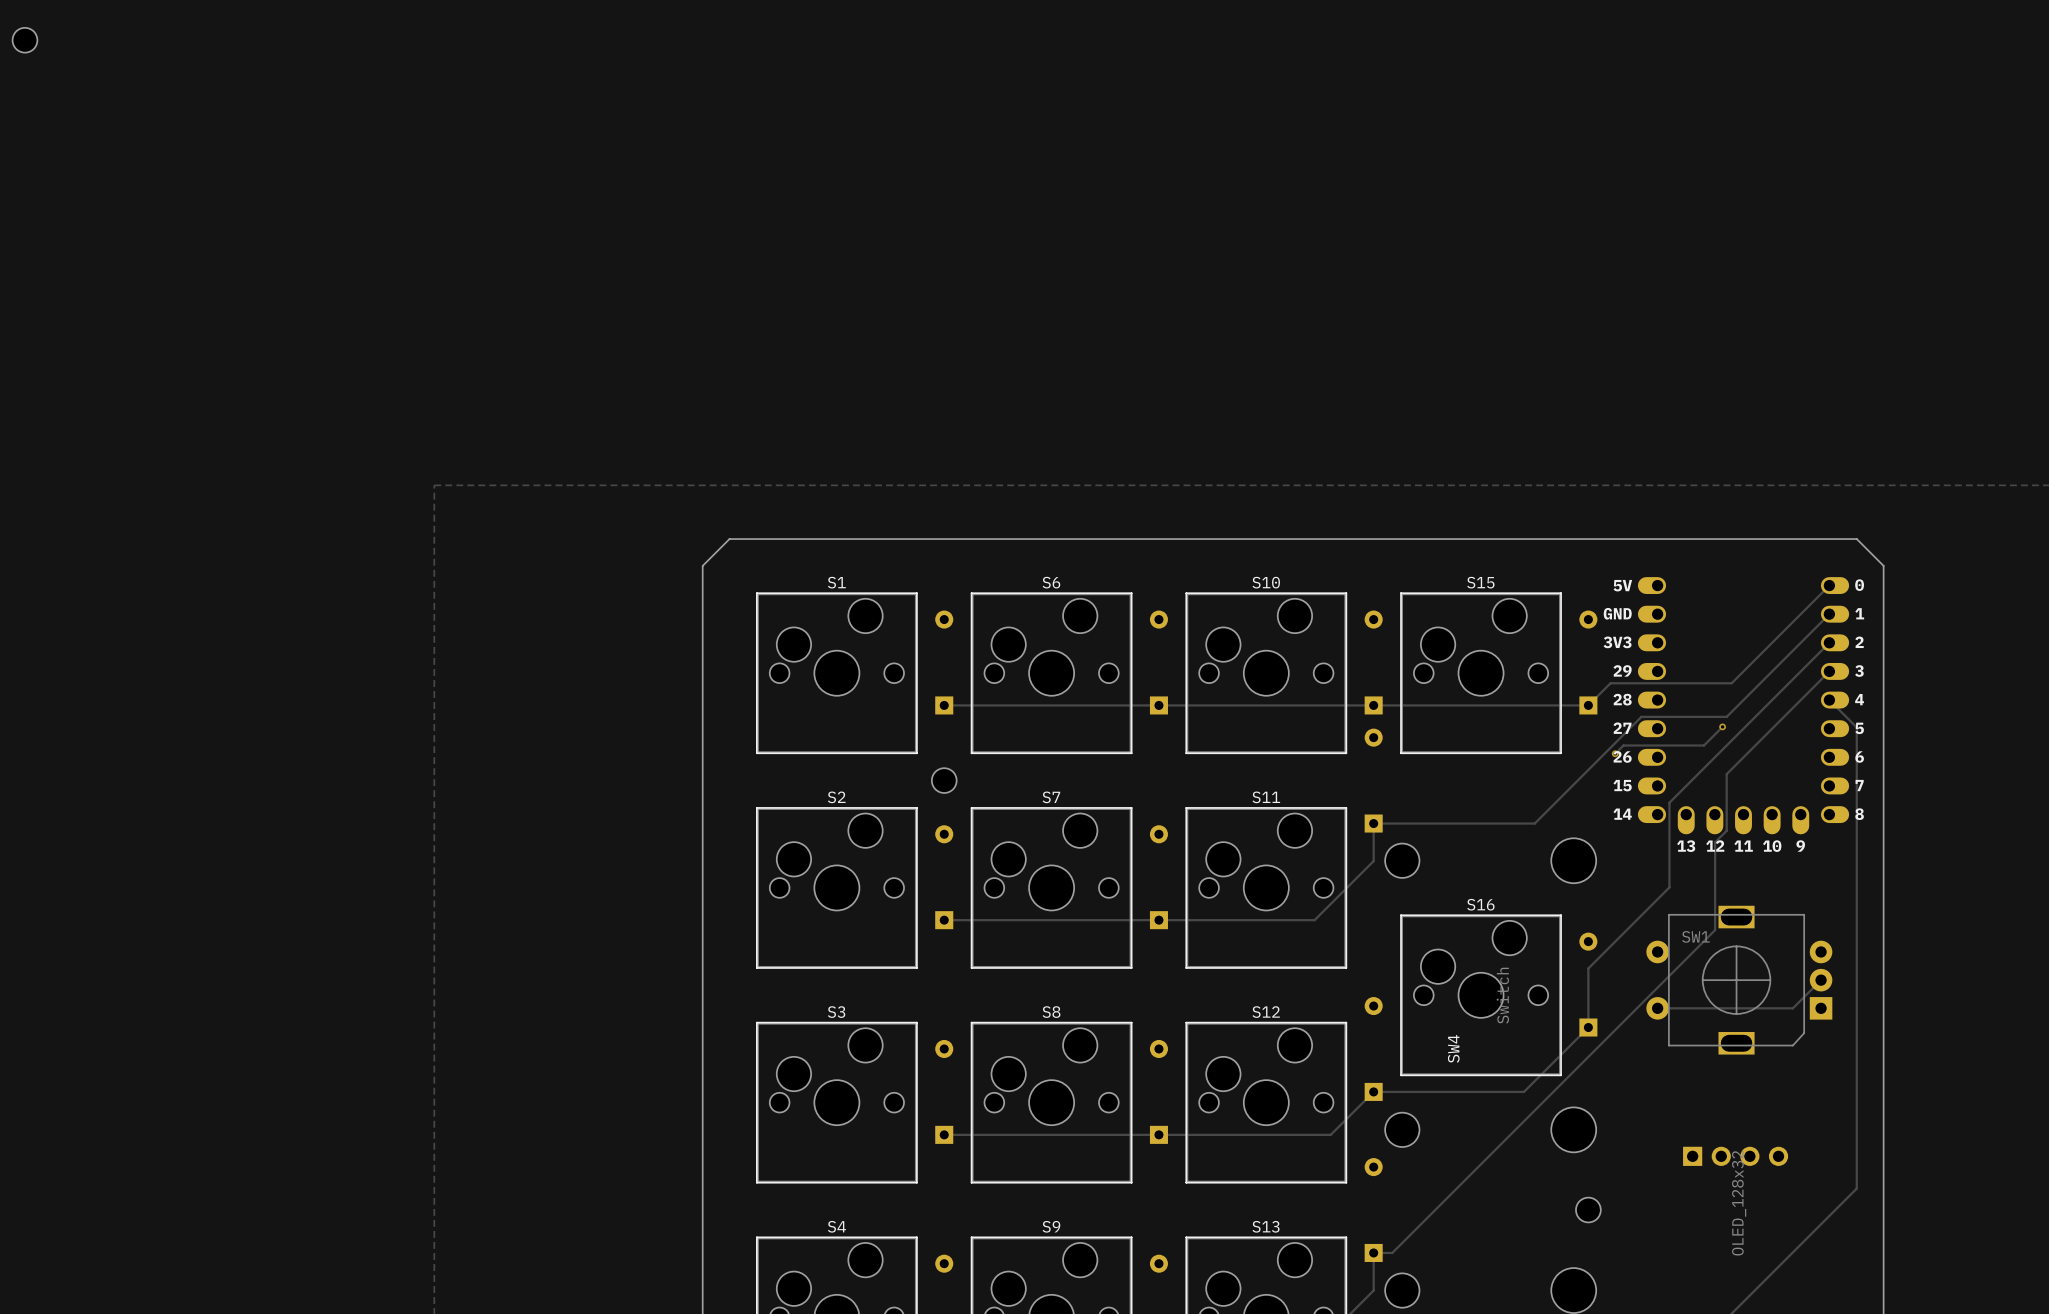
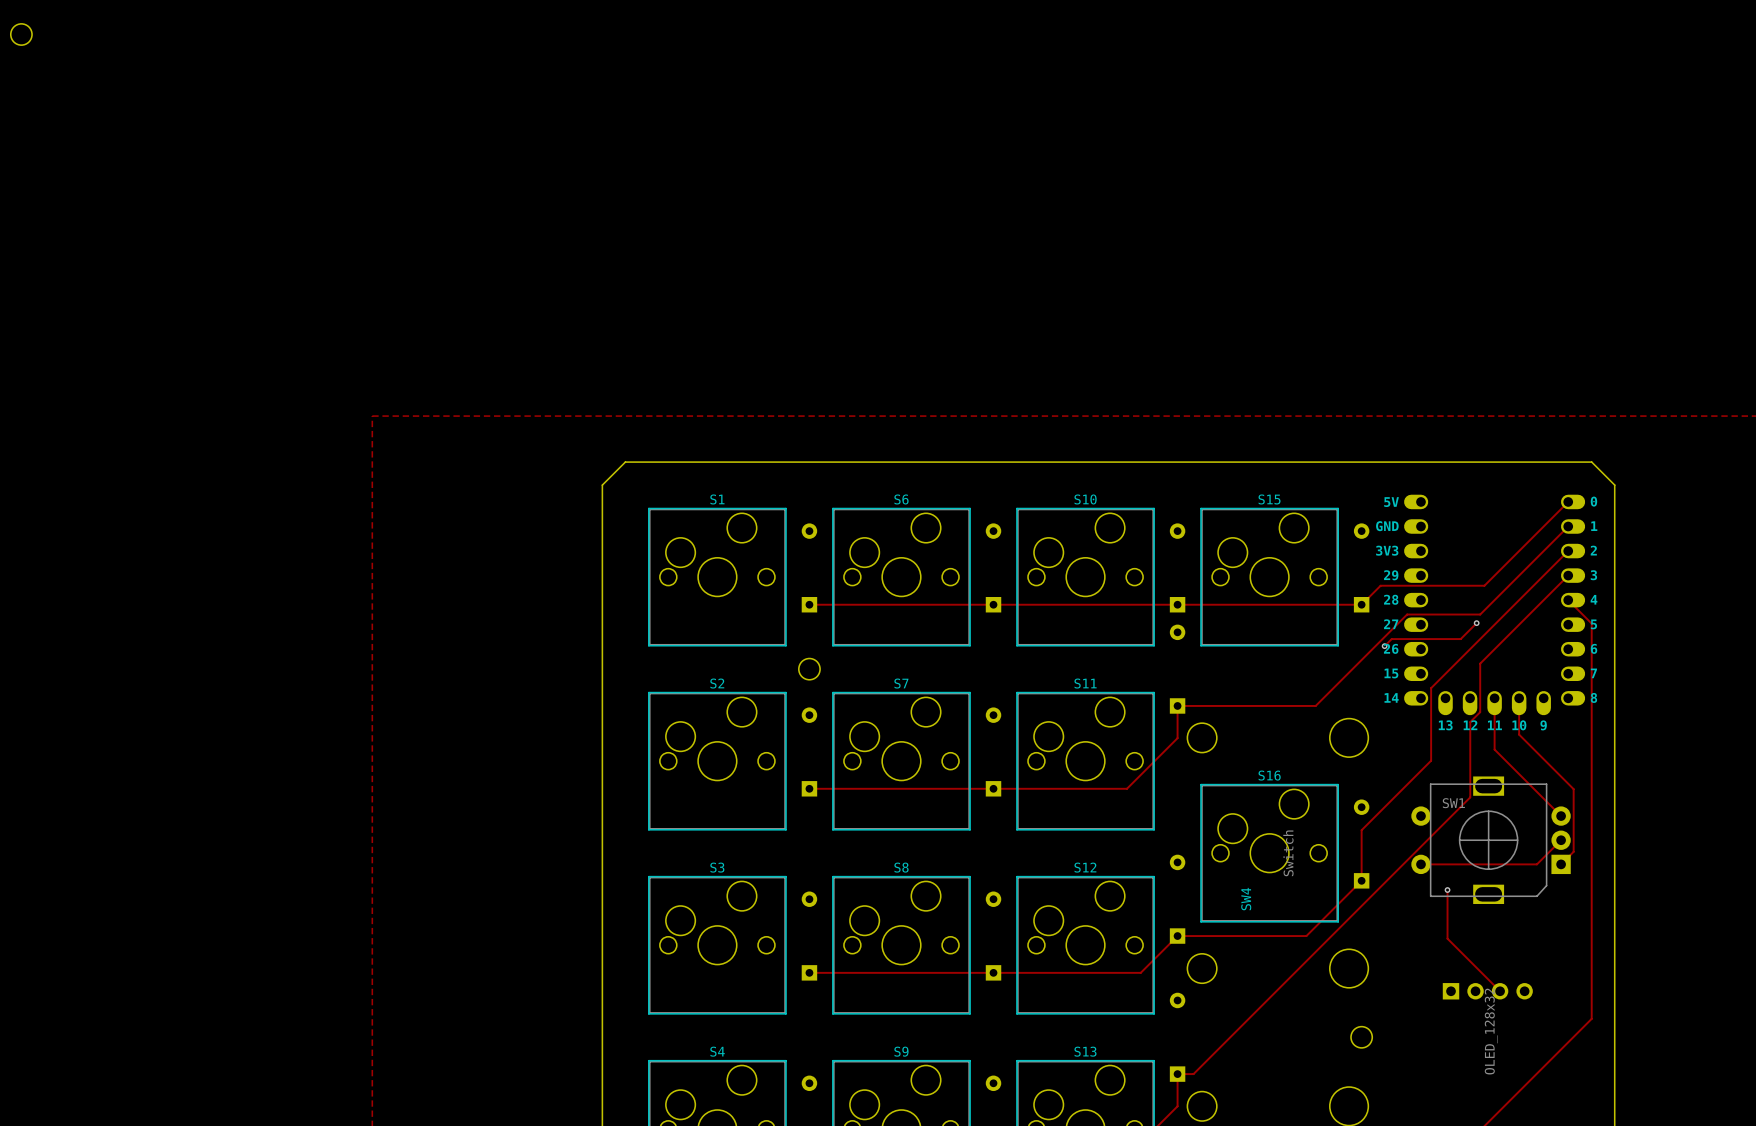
track: none -> (1494, 698) (1494, 749) (1561, 816)
track: none -> (1519, 698) (1519, 734) (1573, 789) (1573, 851) (1561, 864)
track: none -> (1447, 890) (1447, 938) (1500, 991)
via: none -> (1447, 890)

